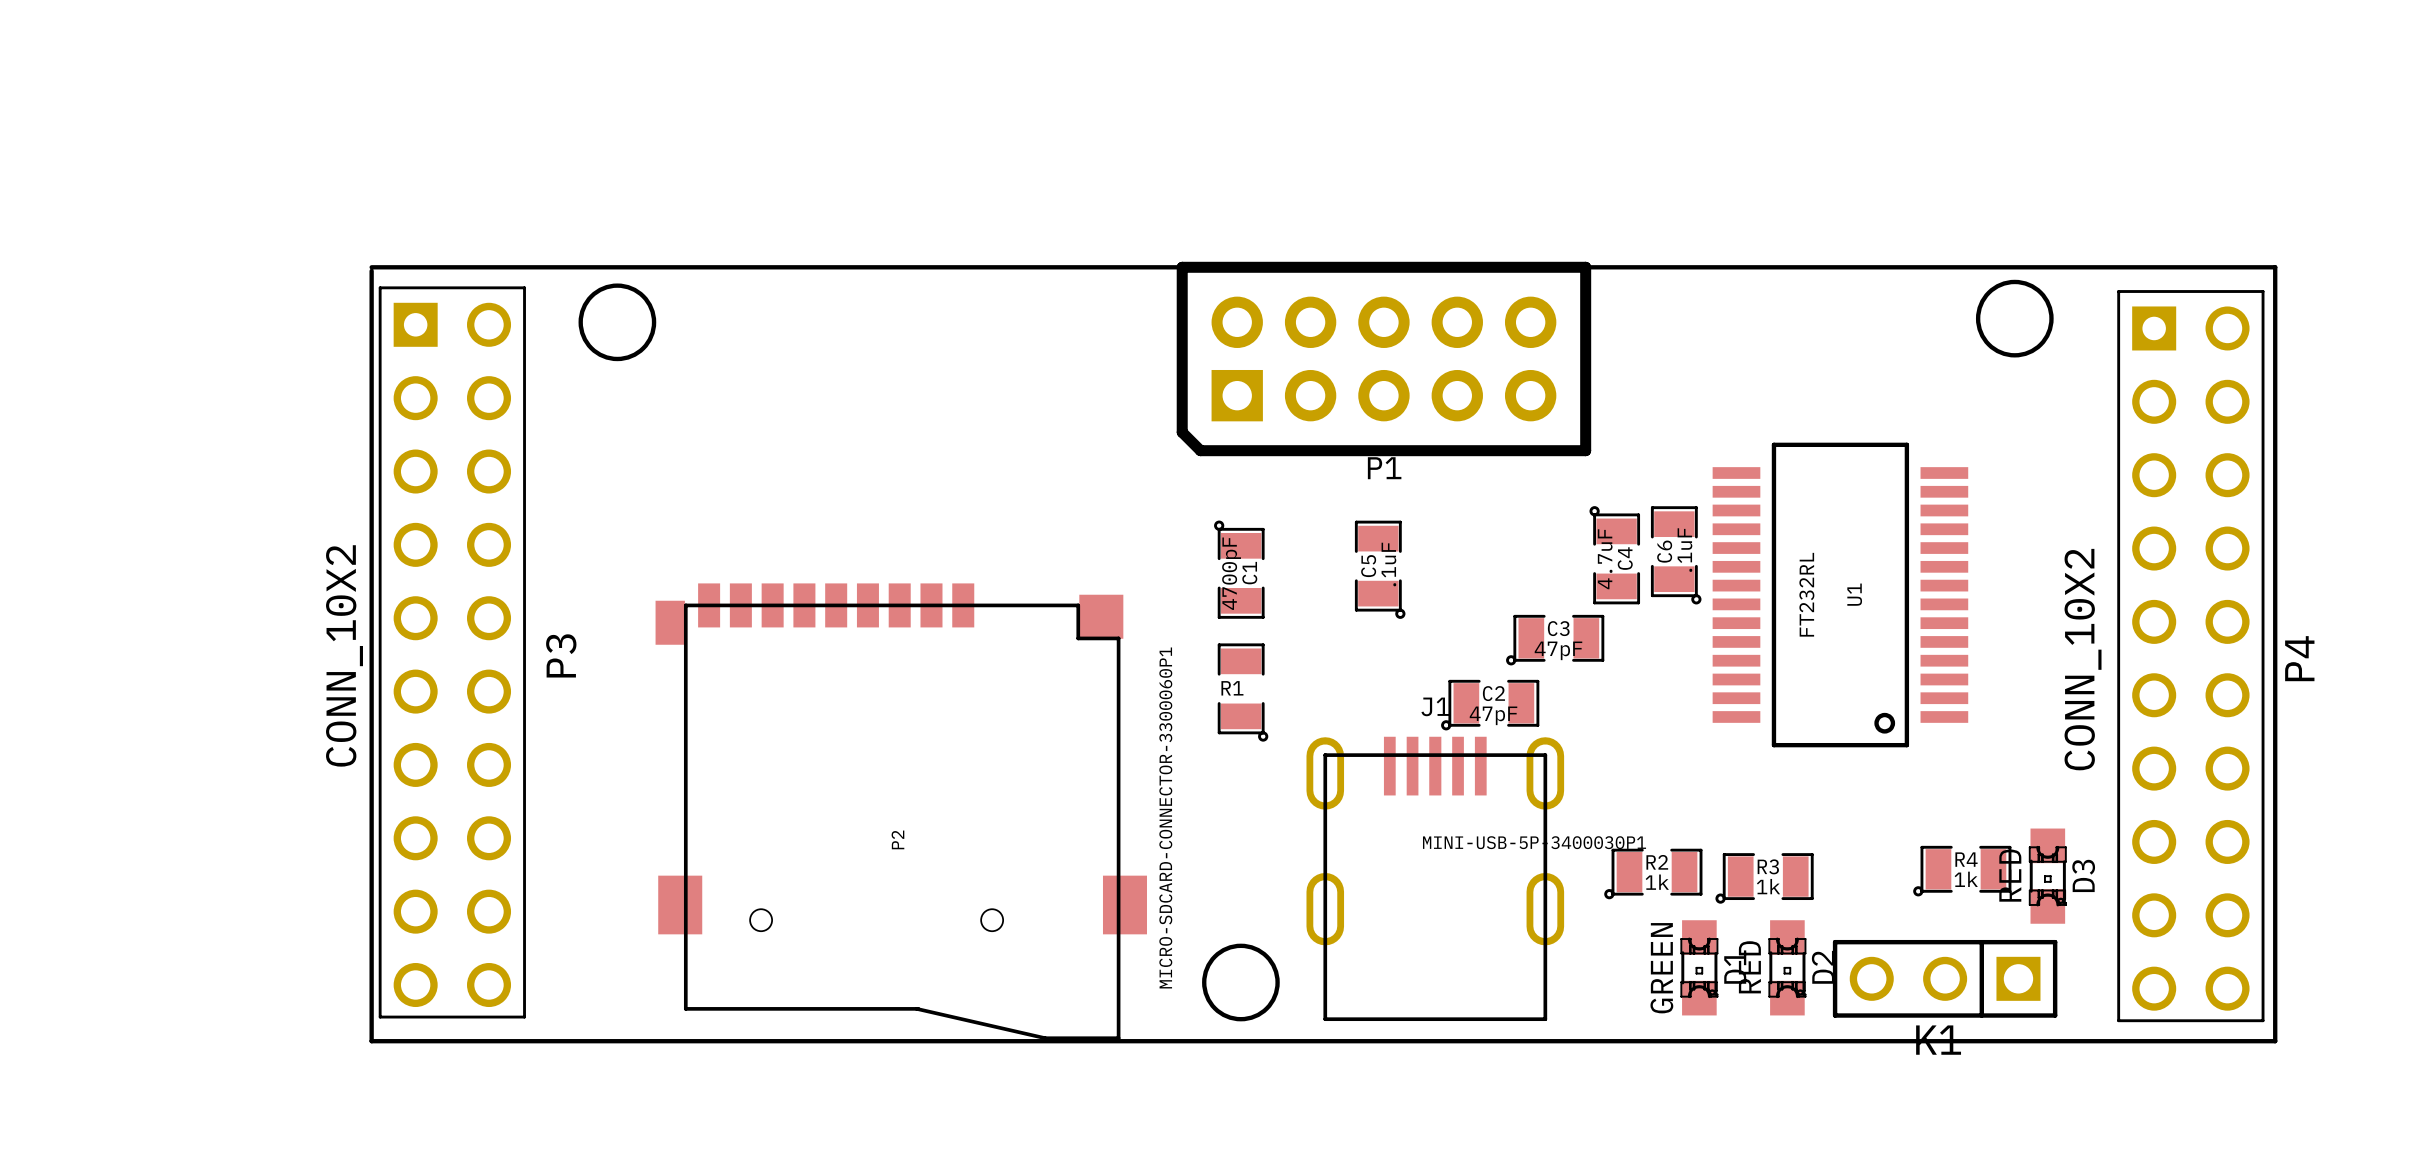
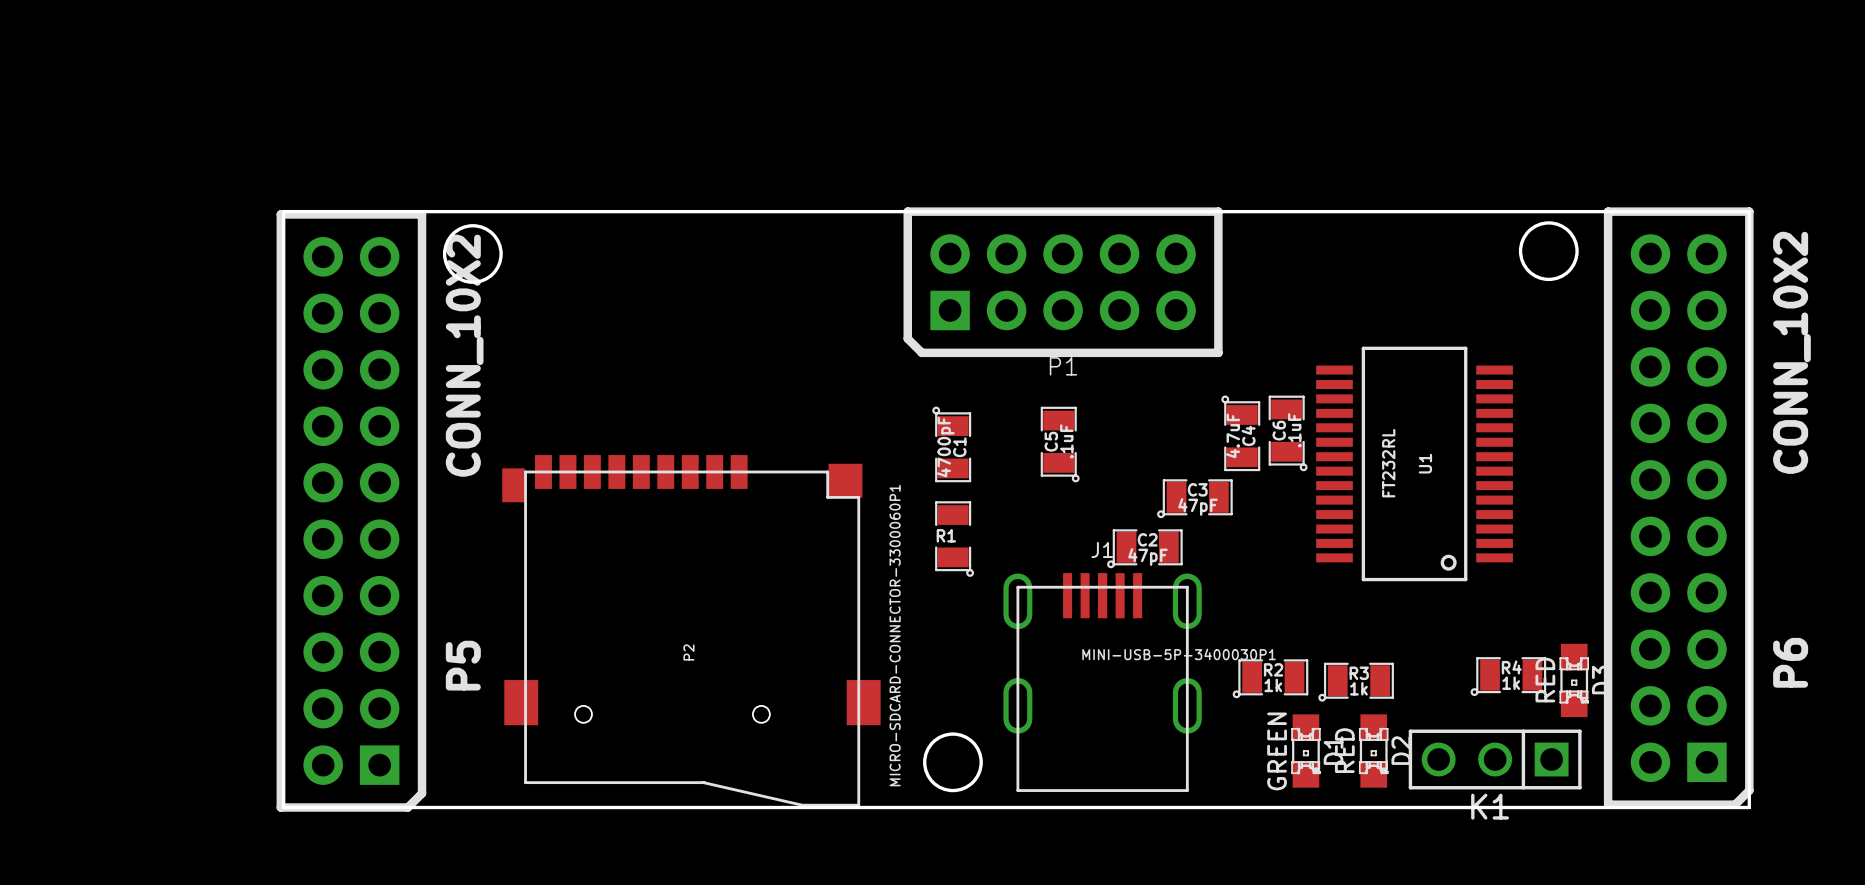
P3: CONN_10X2 (452, 652) -> none
P6: none -> CONN_10X2 (1678, 508)
P5: none -> CONN_10X2 (351, 510)
P4: CONN_10X2 (2190, 656) -> none

